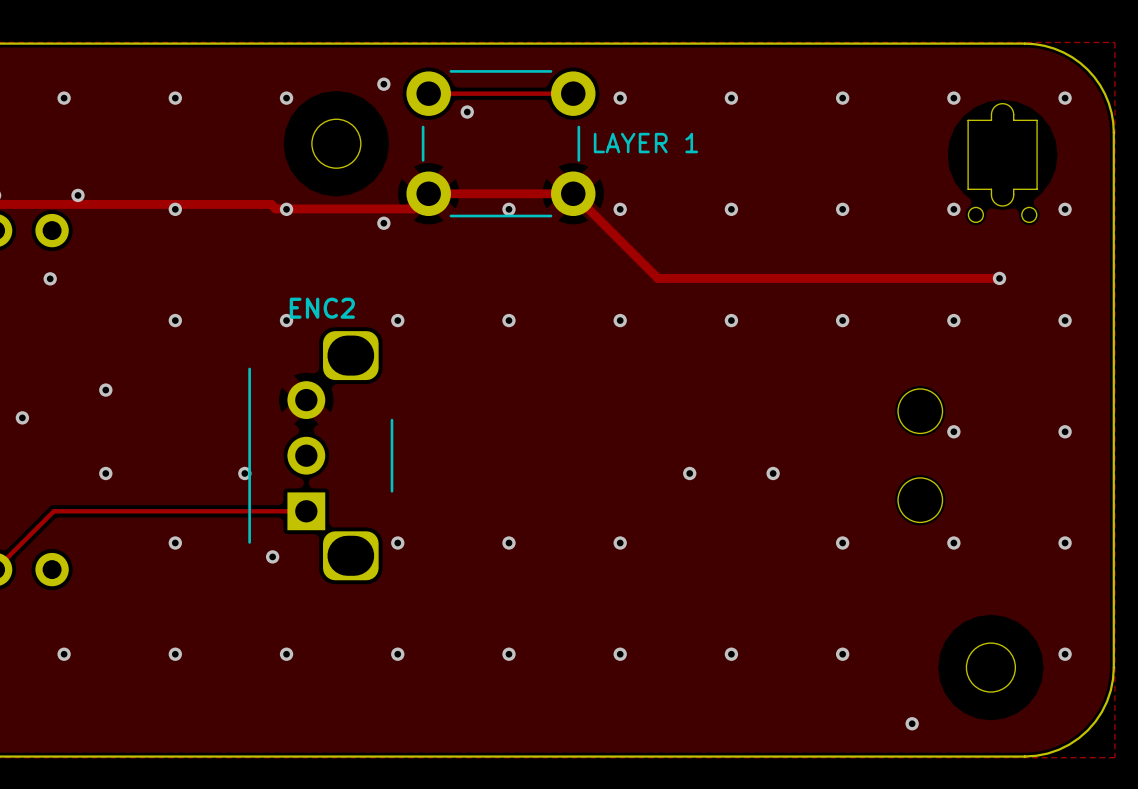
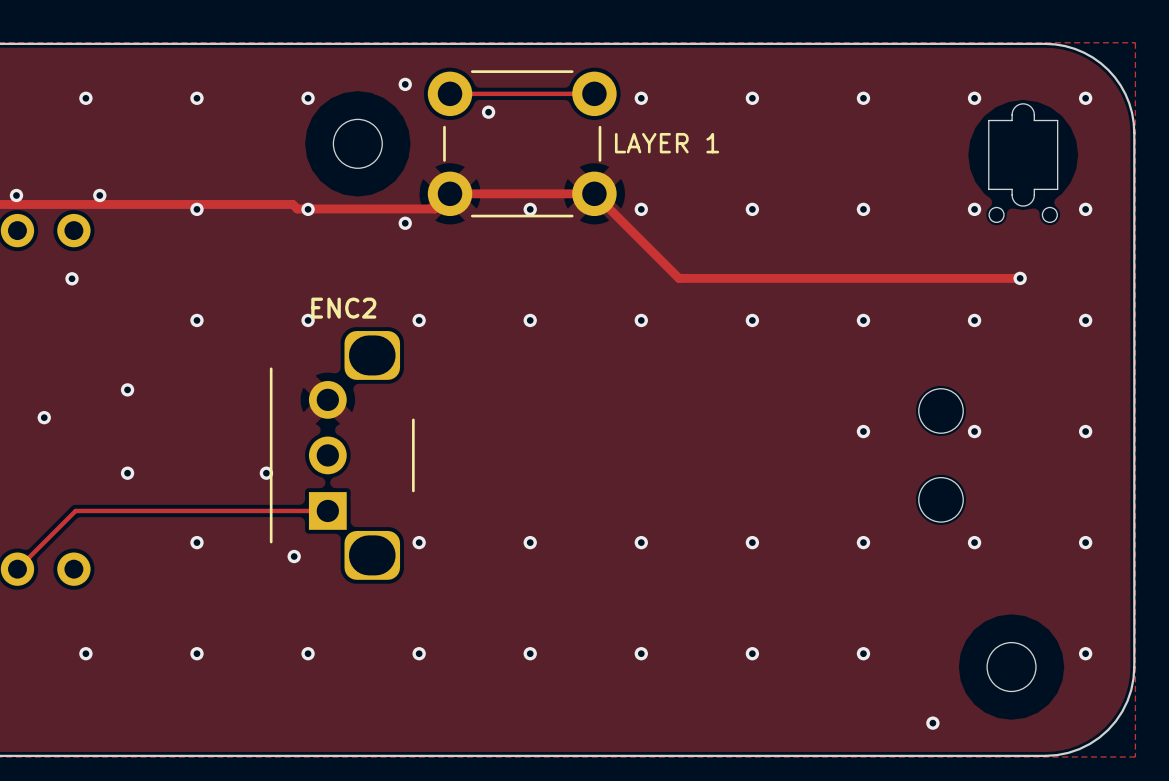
via: none -> (863, 431)
via: (689, 473) -> none
via: (773, 473) -> none
via: none -> (752, 542)

